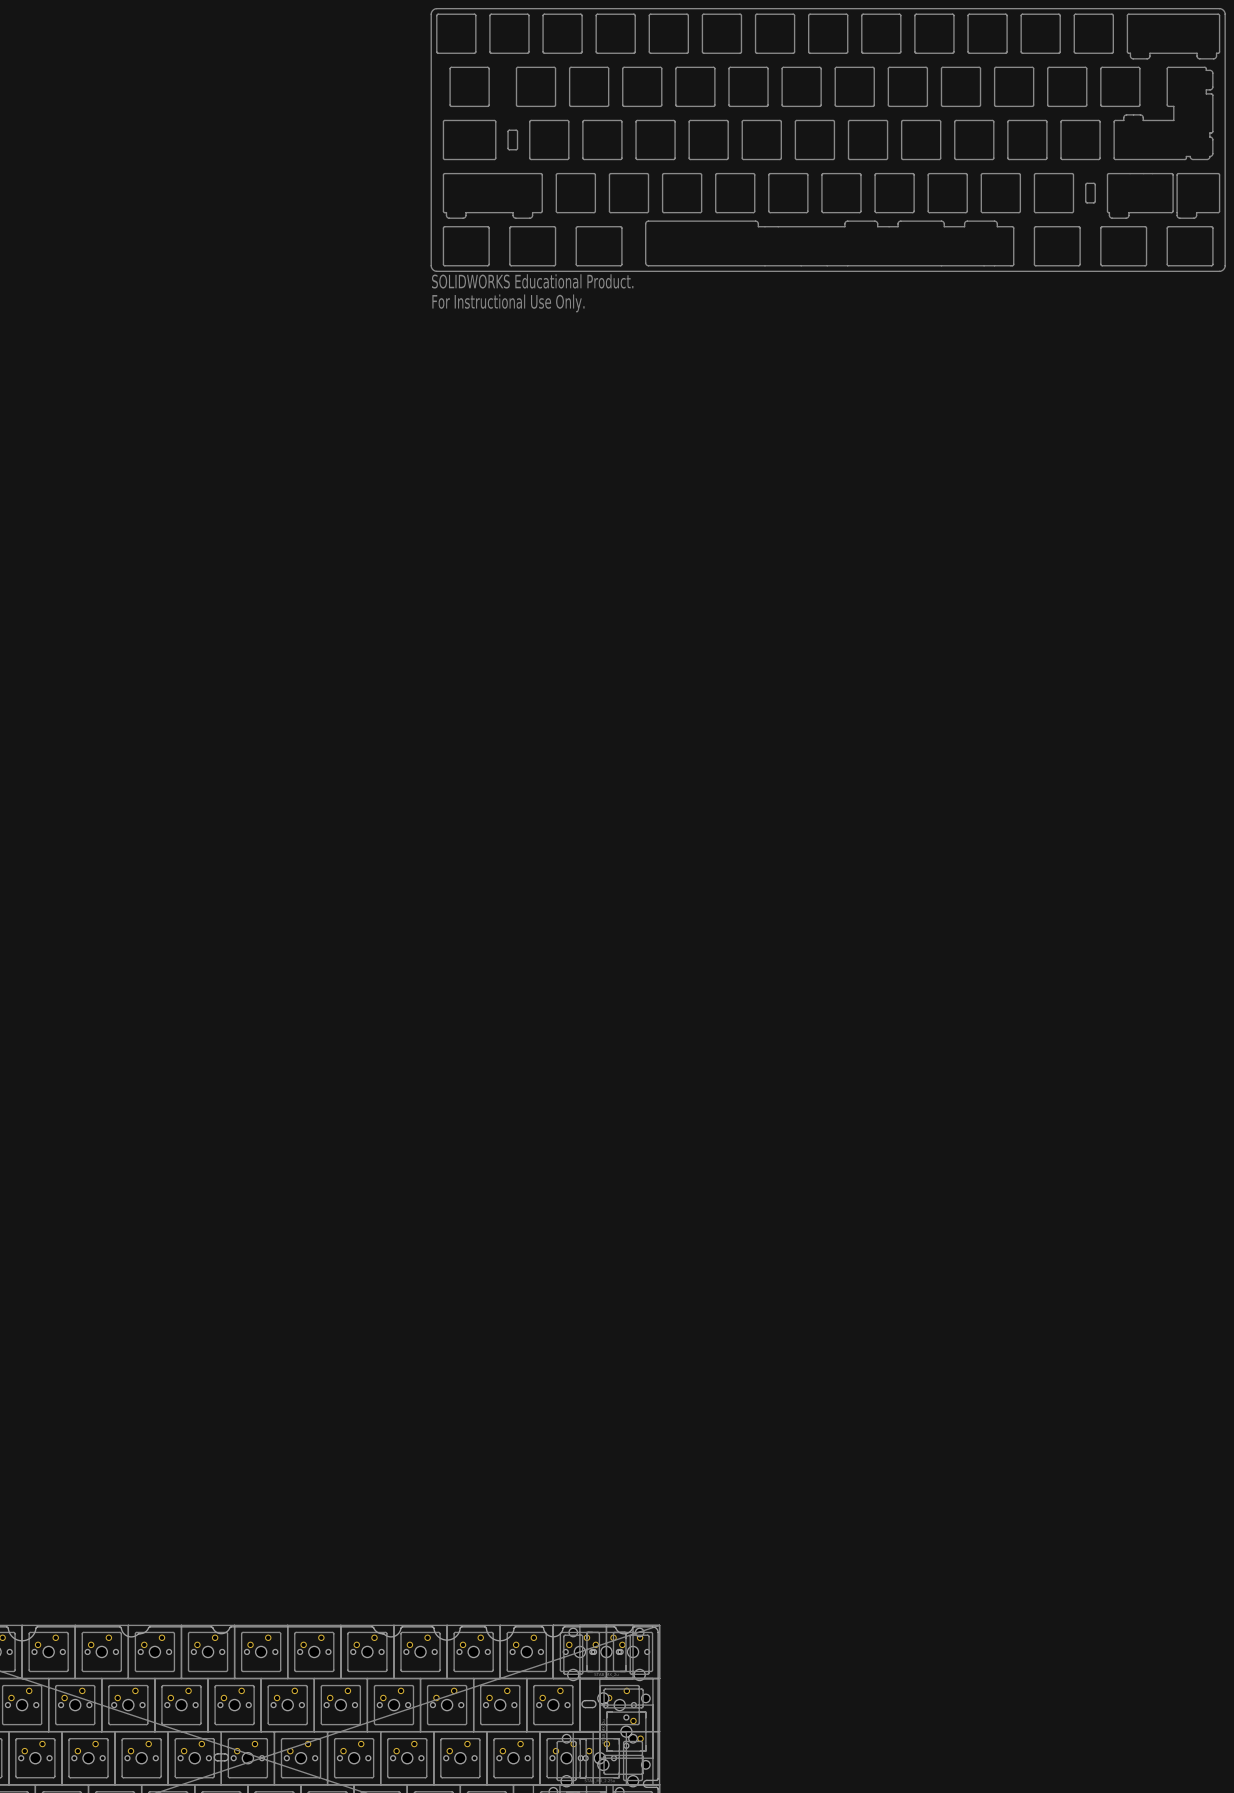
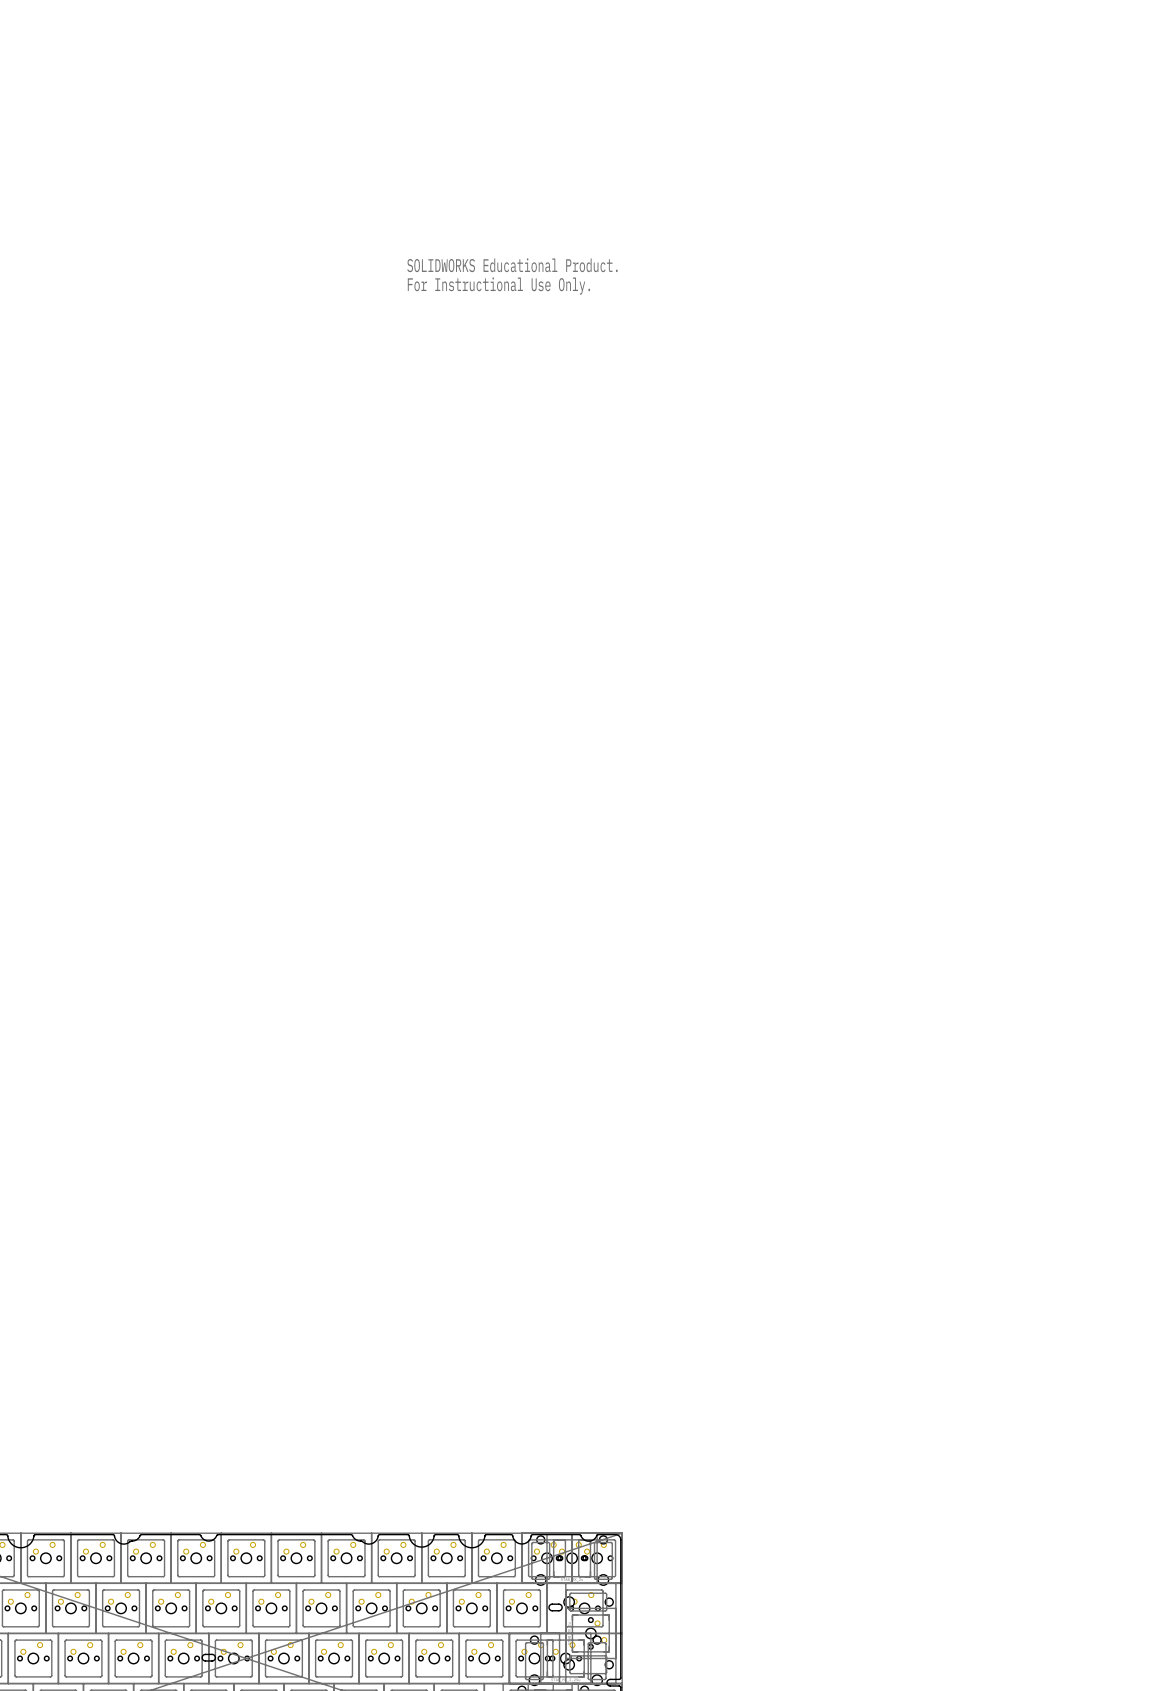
line: (436, 8) (1221, 8) (1225, 14) (1224, 267) (1219, 271) (435, 271) (431, 265) (431, 14) (432, 10) (436, 8) -> none
line: (438, 14) (475, 14) (475, 52) (437, 52) (438, 14) -> none
line: (491, 14) (528, 14) (528, 52) (490, 52) (491, 14) -> none
line: (544, 14) (581, 14) (581, 52) (543, 52) (544, 14) -> none
line: (597, 14) (634, 14) (634, 52) (596, 52) (597, 14) -> none
line: (650, 14) (687, 14) (687, 52) (649, 52) (650, 14) -> none
line: (703, 14) (741, 14) (741, 52) (702, 52) (703, 14) -> none
line: (756, 14) (794, 14) (794, 52) (755, 52) (756, 14) -> none
line: (810, 14) (847, 14) (847, 52) (809, 52) (810, 14) -> none
line: (863, 14) (900, 14) (900, 52) (862, 52) (863, 14) -> none
line: (916, 14) (953, 14) (953, 52) (915, 52) (916, 14) -> none
line: (969, 14) (1006, 14) (1006, 52) (968, 52) (969, 14) -> none
line: (1022, 14) (1059, 14) (1059, 52) (1021, 52) (1022, 14) -> none
line: (1075, 14) (1112, 14) (1112, 52) (1074, 52) (1075, 14) -> none
line: (1128, 14) (1218, 14) (1219, 52) (1216, 53) (1214, 58) (1199, 58) (1197, 53) (1149, 53) (1147, 58) (1132, 58) (1130, 53) (1127, 52) (1128, 14) -> none
line: (451, 67) (488, 67) (488, 105) (450, 105) (451, 67) -> none
line: (517, 67) (555, 67) (555, 105) (516, 105) (517, 67) -> none
line: (571, 67) (608, 67) (608, 105) (570, 105) (571, 67) -> none
line: (624, 67) (661, 67) (661, 105) (623, 105) (624, 67) -> none
line: (677, 67) (714, 67) (714, 105) (676, 105) (677, 67) -> none
line: (730, 67) (767, 67) (767, 105) (729, 105) (730, 67) -> none
line: (783, 67) (820, 67) (820, 105) (782, 105) (783, 67) -> none
line: (836, 67) (873, 67) (873, 105) (835, 105) (836, 67) -> none
line: (889, 67) (926, 67) (926, 105) (888, 105) (889, 67) -> none
line: (942, 67) (980, 67) (980, 105) (941, 105) (942, 67) -> none
line: (995, 67) (1033, 67) (1033, 105) (995, 105) (995, 67) -> none
line: (1049, 67) (1086, 67) (1086, 105) (1048, 105) (1049, 67) -> none
line: (1102, 67) (1139, 67) (1139, 105) (1101, 105) (1102, 67) -> none
line: (1168, 67) (1205, 67) (1206, 70) (1212, 71) (1212, 87) (1206, 89) (1206, 93) (1212, 95) (1212, 131) (1209, 132) (1209, 136) (1212, 139) (1212, 154) (1207, 159) (1192, 159) (1190, 156) (1186, 156) (1184, 159) (1114, 159) (1114, 120) (1123, 120) (1126, 114) (1141, 115) (1143, 120) (1173, 120) (1173, 106) (1167, 105) (1168, 67) -> none
line: (444, 120) (495, 120) (495, 158) (443, 159) (444, 120) -> none
line: (531, 120) (568, 120) (568, 159) (530, 159) (531, 120) -> none
line: (584, 120) (621, 120) (621, 159) (583, 159) (584, 120) -> none
line: (637, 120) (674, 120) (674, 159) (636, 159) (637, 120) -> none
line: (690, 120) (727, 120) (727, 159) (689, 159) (690, 120) -> none
line: (743, 120) (780, 120) (780, 159) (742, 159) (743, 120) -> none
line: (796, 120) (834, 120) (834, 159) (795, 159) (796, 120) -> none
line: (849, 120) (887, 120) (887, 159) (848, 159) (849, 120) -> none
line: (903, 120) (940, 120) (940, 159) (902, 159) (903, 120) -> none
line: (956, 120) (993, 120) (993, 159) (955, 159) (956, 120) -> none
line: (1009, 120) (1046, 120) (1046, 159) (1008, 159) (1009, 120) -> none
line: (1062, 120) (1099, 120) (1099, 159) (1061, 159) (1062, 120) -> none
line: (509, 130) (517, 131) (516, 149) (508, 148) (509, 130) -> none
line: (444, 173) (541, 173) (542, 211) (532, 212) (530, 218) (515, 218) (513, 212) (466, 212) (464, 218) (448, 217) (446, 212) (443, 211) (444, 173) -> none
line: (557, 173) (594, 174) (594, 212) (556, 212) (557, 173) -> none
line: (610, 173) (648, 174) (648, 212) (609, 212) (610, 173) -> none
line: (663, 173) (701, 174) (701, 212) (662, 212) (663, 173) -> none
line: (717, 173) (754, 174) (754, 212) (716, 212) (717, 173) -> none
line: (770, 173) (807, 174) (807, 212) (769, 212) (770, 173) -> none
line: (823, 173) (860, 174) (860, 212) (822, 212) (823, 173) -> none
line: (876, 173) (913, 174) (913, 212) (875, 212) (876, 173) -> none
line: (929, 173) (966, 174) (966, 212) (928, 212) (929, 173) -> none
line: (982, 173) (1019, 174) (1019, 212) (981, 212) (982, 173) -> none
line: (1035, 173) (1073, 174) (1073, 212) (1034, 212) (1035, 173) -> none
line: (1108, 173) (1172, 173) (1172, 211) (1128, 212) (1126, 218) (1110, 217) (1107, 211) (1108, 173) -> none
line: (1178, 173) (1219, 174) (1219, 212) (1196, 212) (1194, 218) (1177, 217) (1178, 173) -> none
line: (1087, 183) (1095, 184) (1094, 202) (1085, 201) (1087, 183) -> none
line: (648, 221) (755, 221) (757, 222) (758, 226) (844, 226) (845, 222) (847, 221) (875, 221) (877, 226) (898, 226) (900, 221) (941, 221) (944, 226) (964, 226) (966, 221) (994, 221) (997, 226) (1013, 227) (1013, 264) (648, 265) (645, 263) (645, 223) (648, 221) -> none
line: (444, 226) (488, 227) (488, 265) (443, 265) (444, 226) -> none
line: (511, 226) (555, 227) (555, 265) (510, 265) (511, 226) -> none
line: (577, 226) (621, 227) (621, 265) (576, 265) (577, 226) -> none
line: (1035, 226) (1079, 227) (1079, 265) (1034, 265) (1035, 226) -> none
line: (1102, 226) (1146, 227) (1146, 265) (1101, 265) (1102, 226) -> none
line: (1168, 226) (1212, 227) (1212, 265) (1167, 265) (1168, 226) -> none

